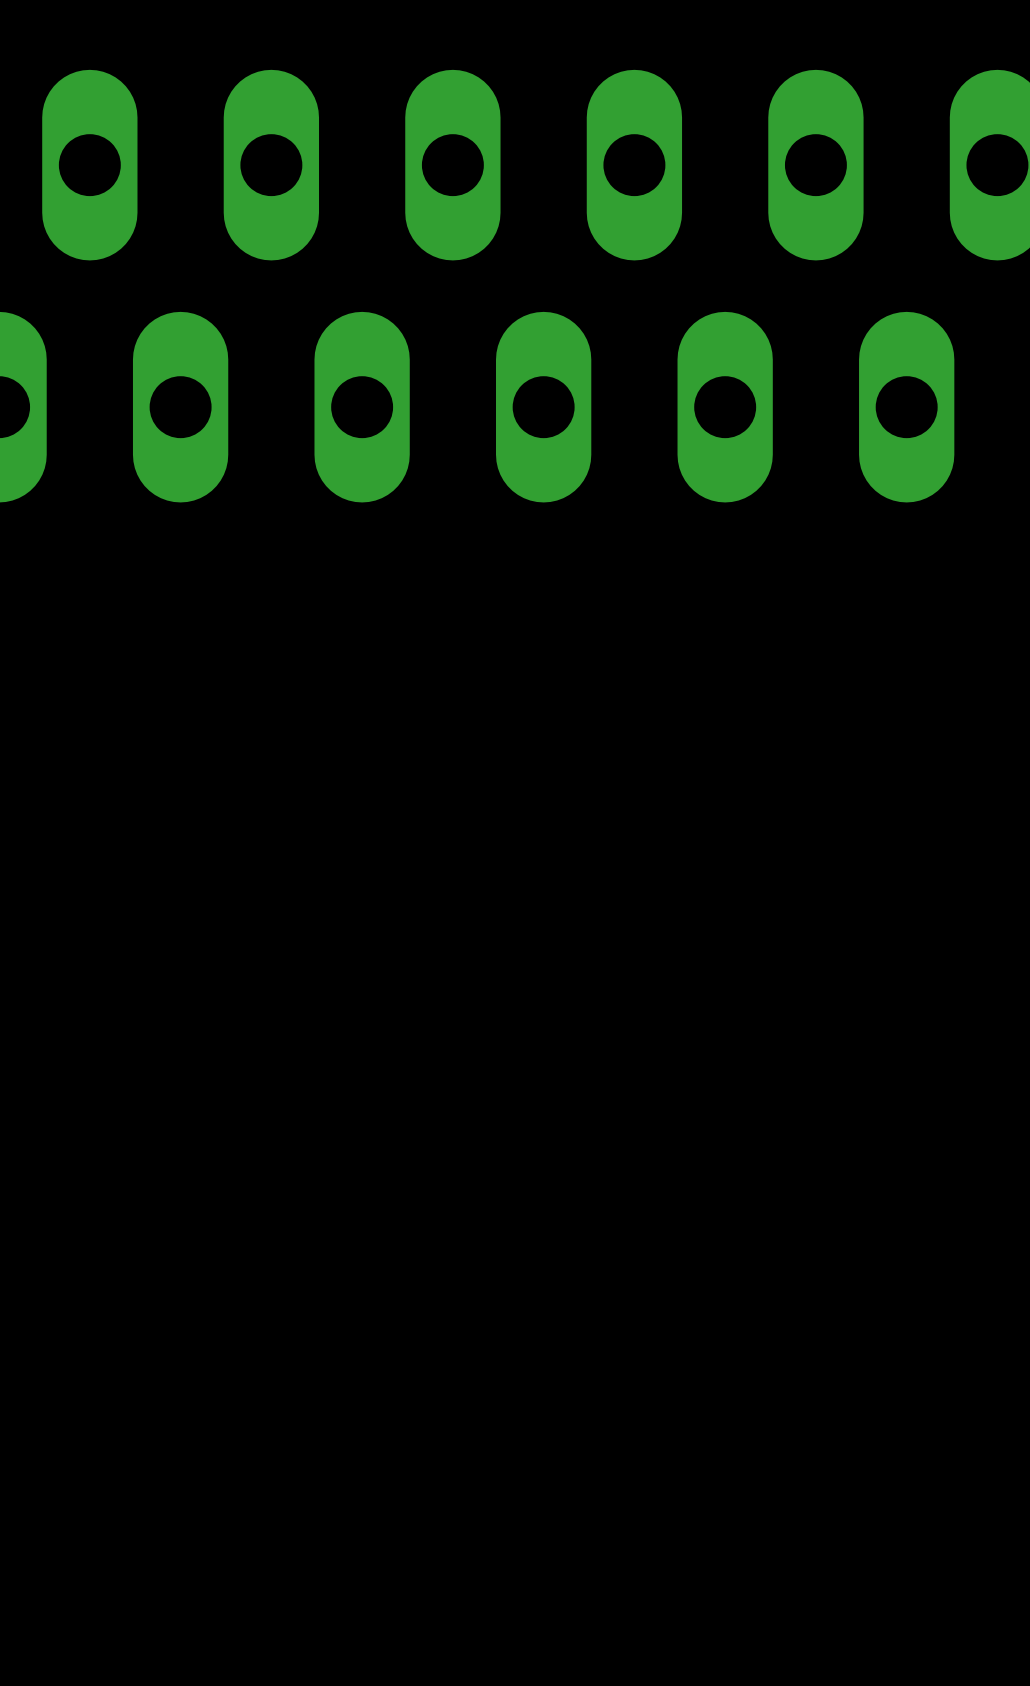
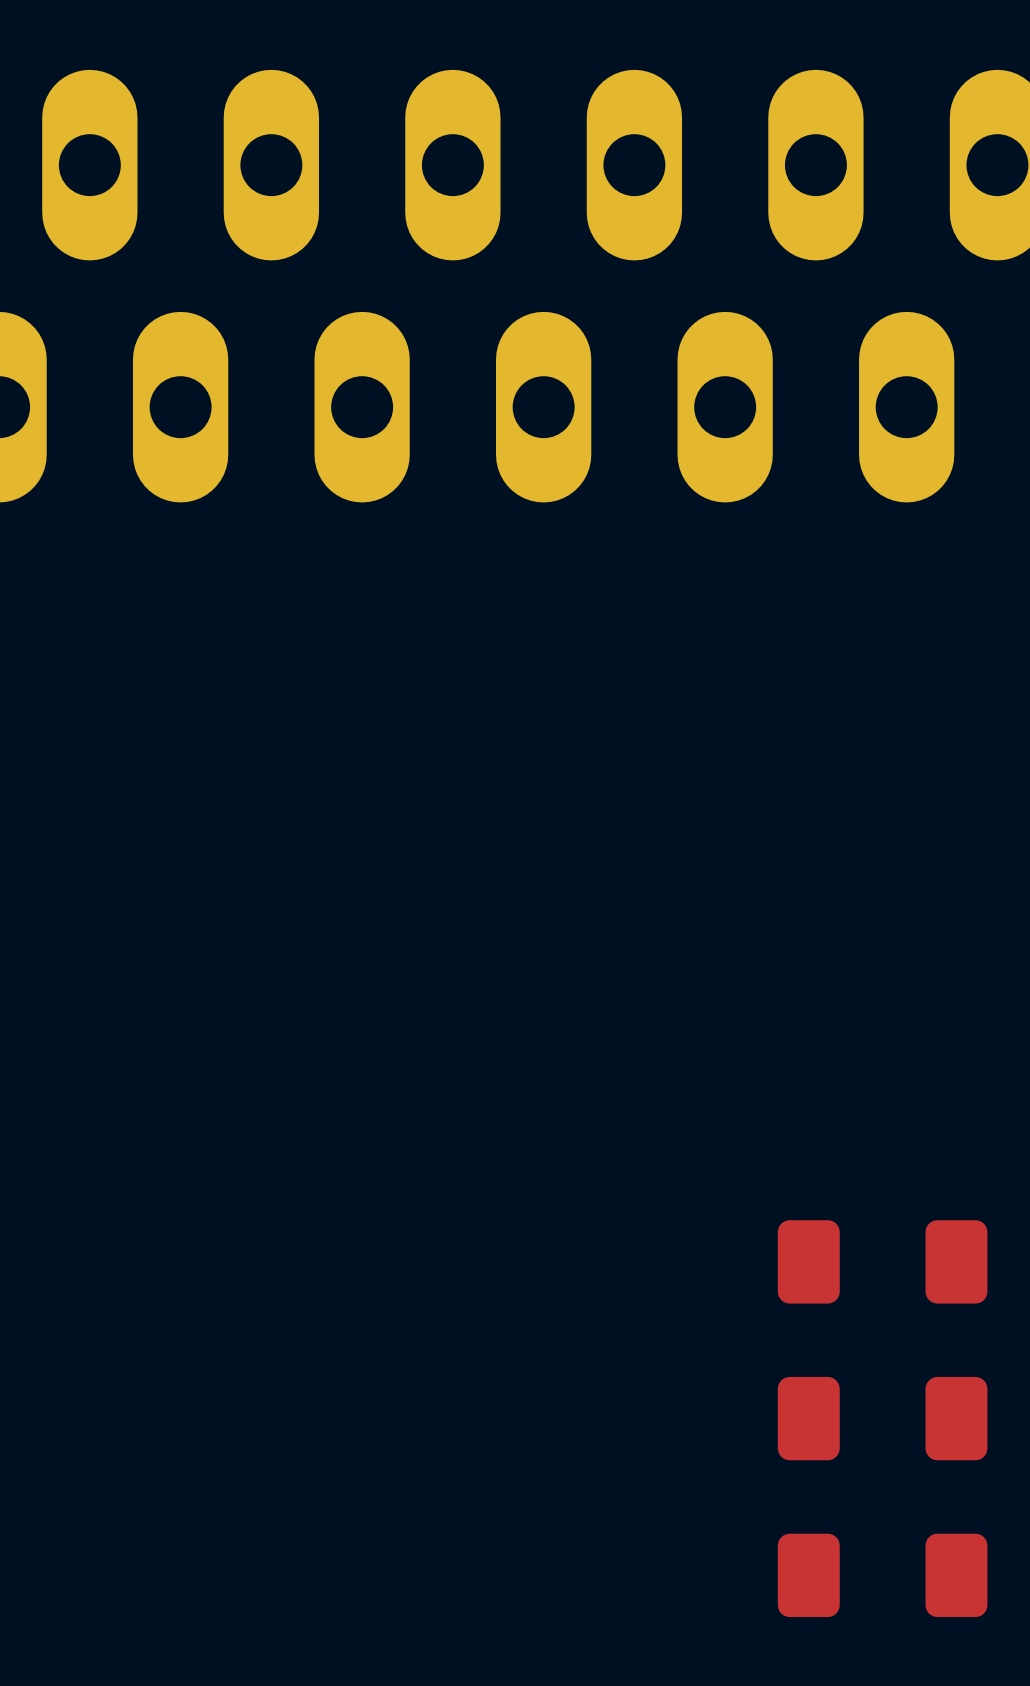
part: none -> (882, 1261)
part: none -> (882, 1418)
part: none -> (882, 1575)

